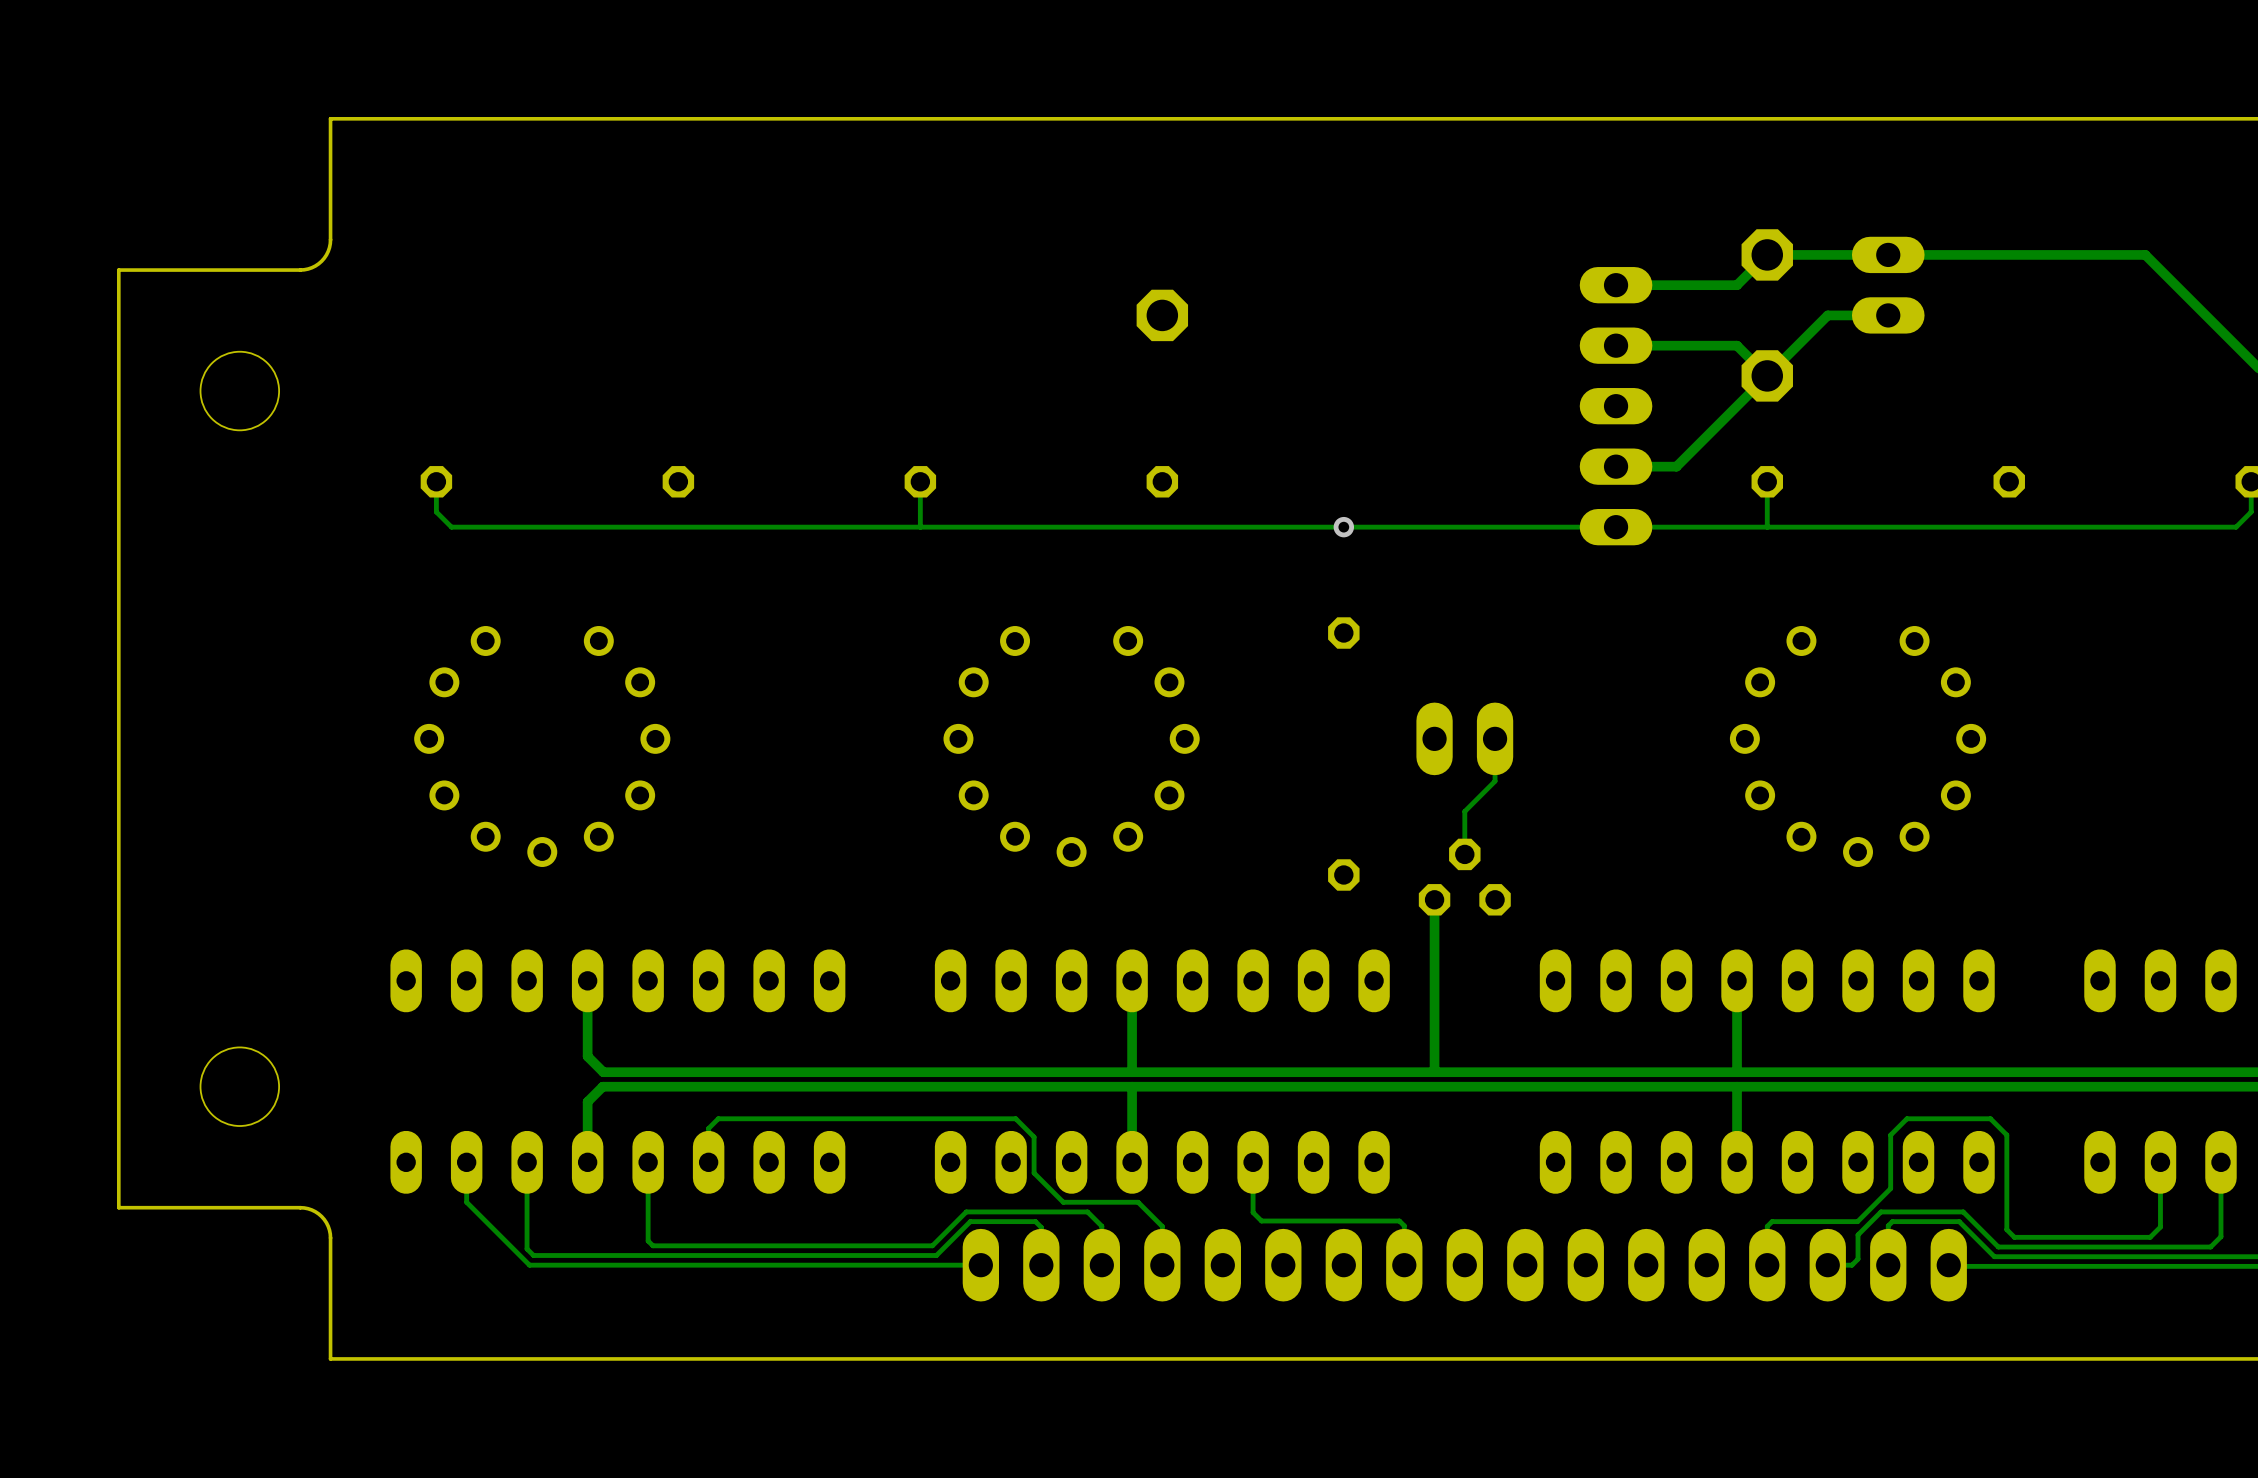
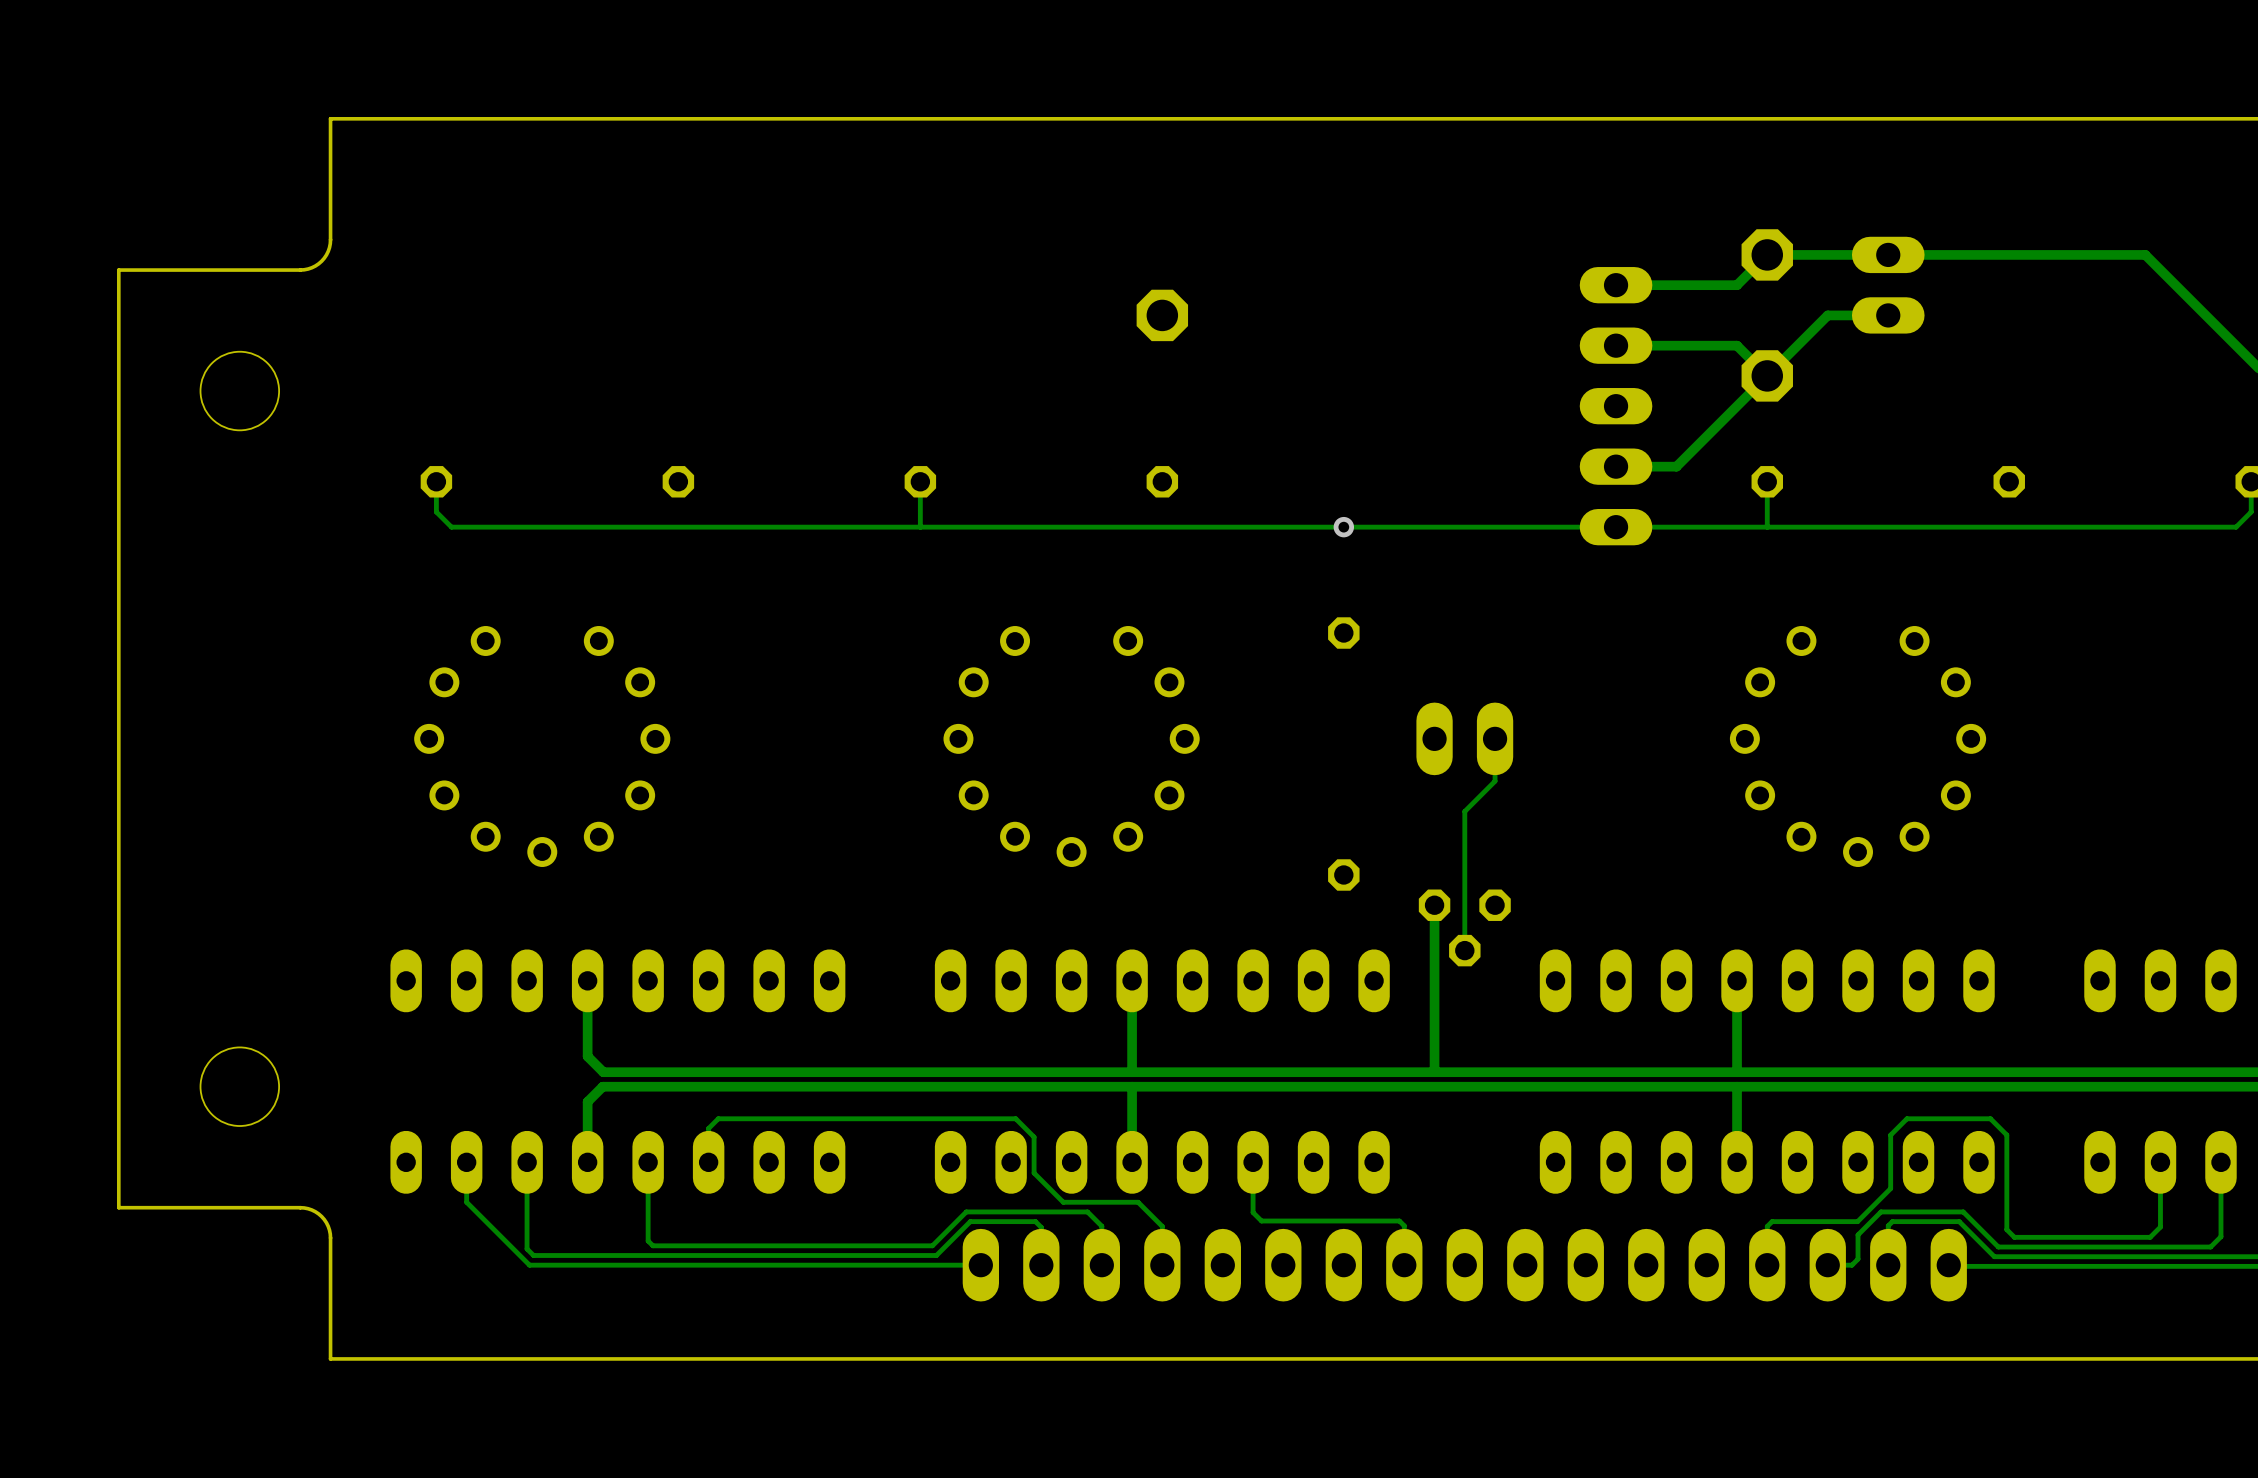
track: none -> (1464, 854) (1464, 950)
part rotation: 0° (1464, 877) -> 180° (1464, 927)

